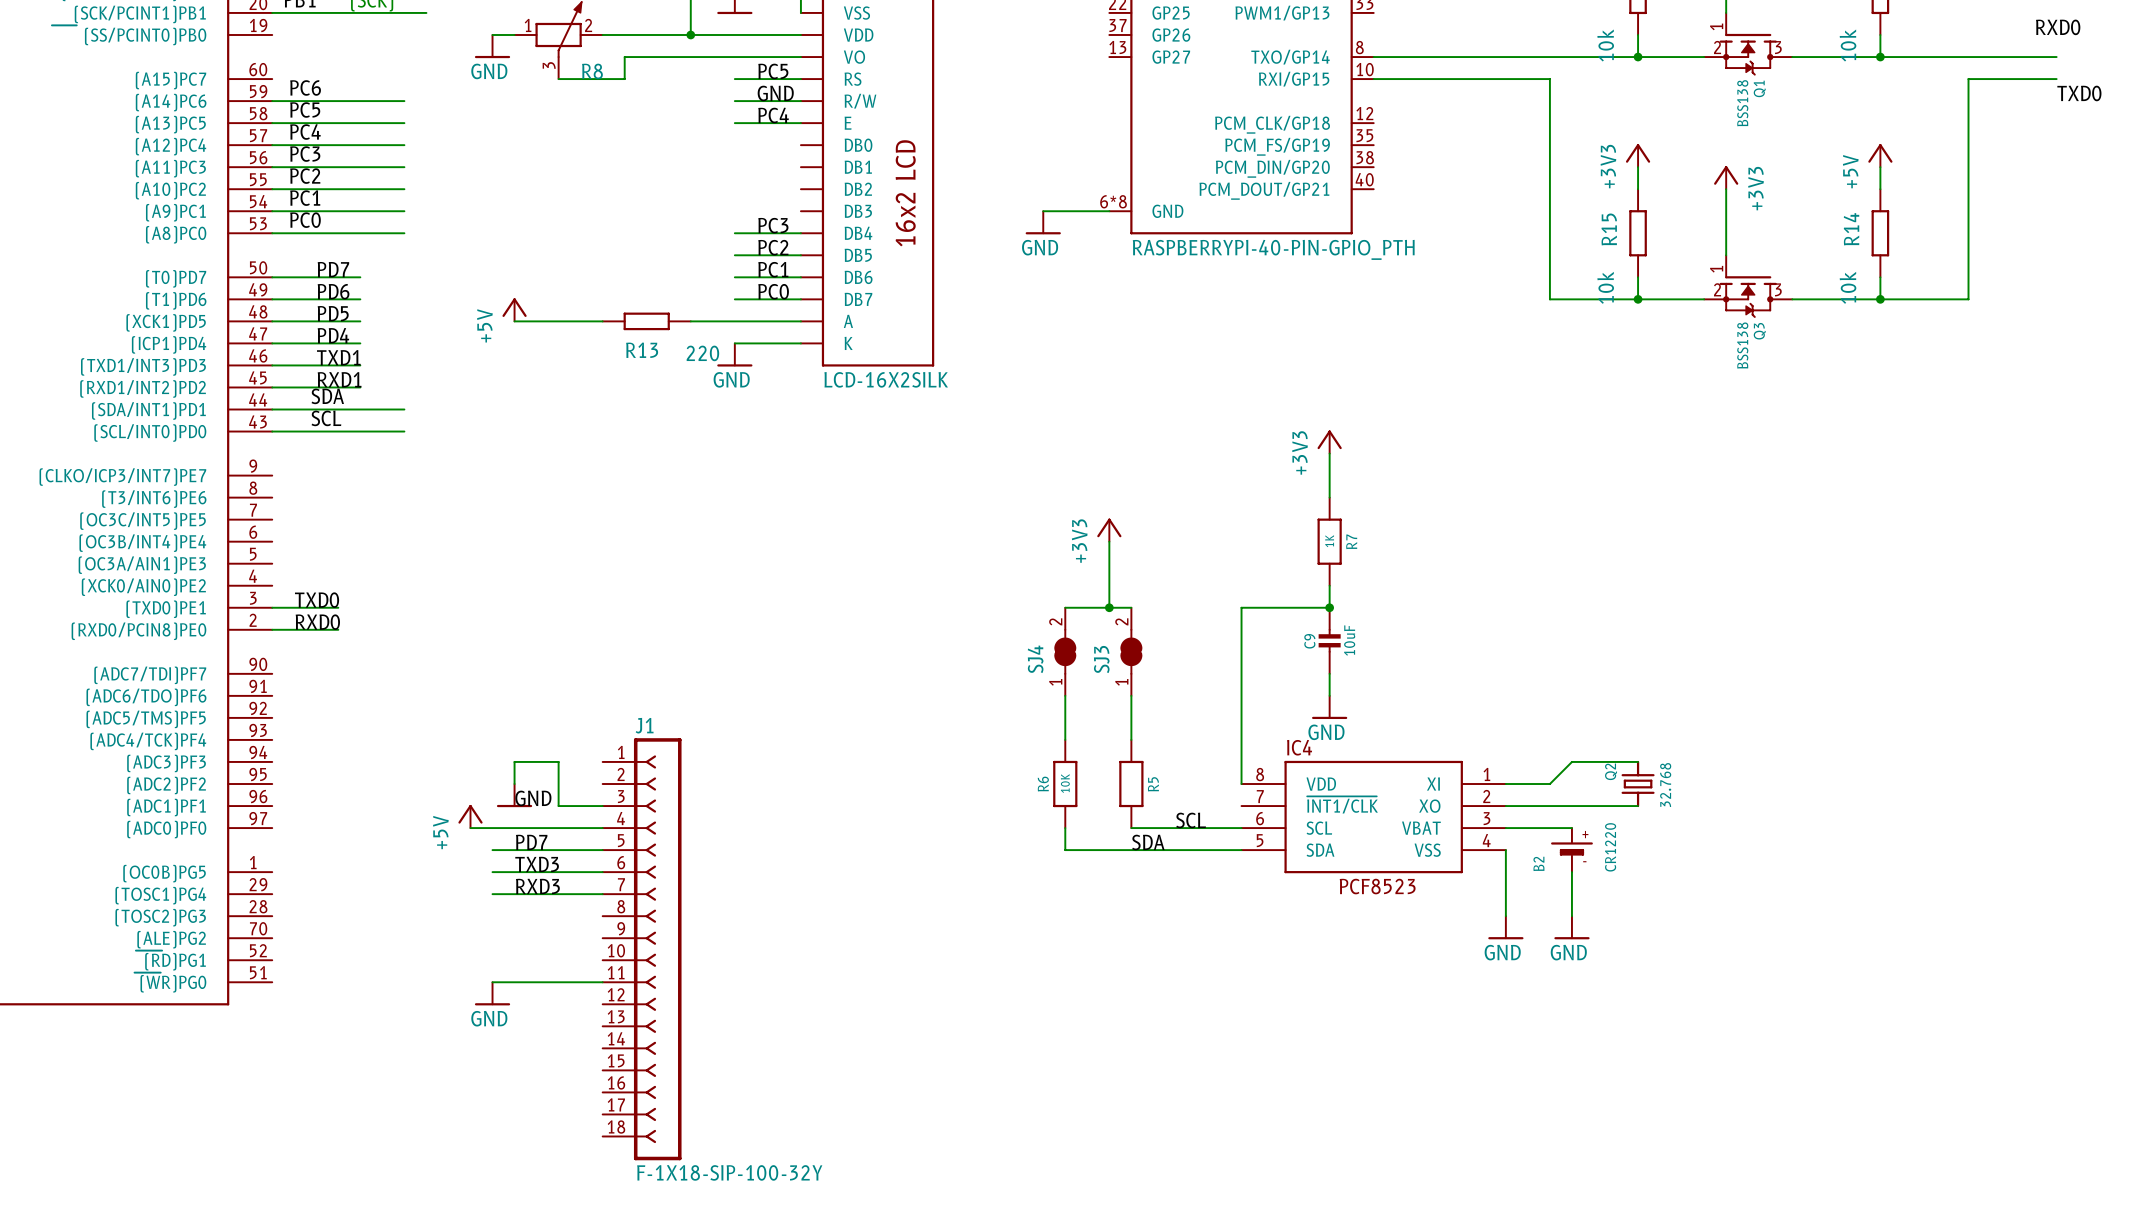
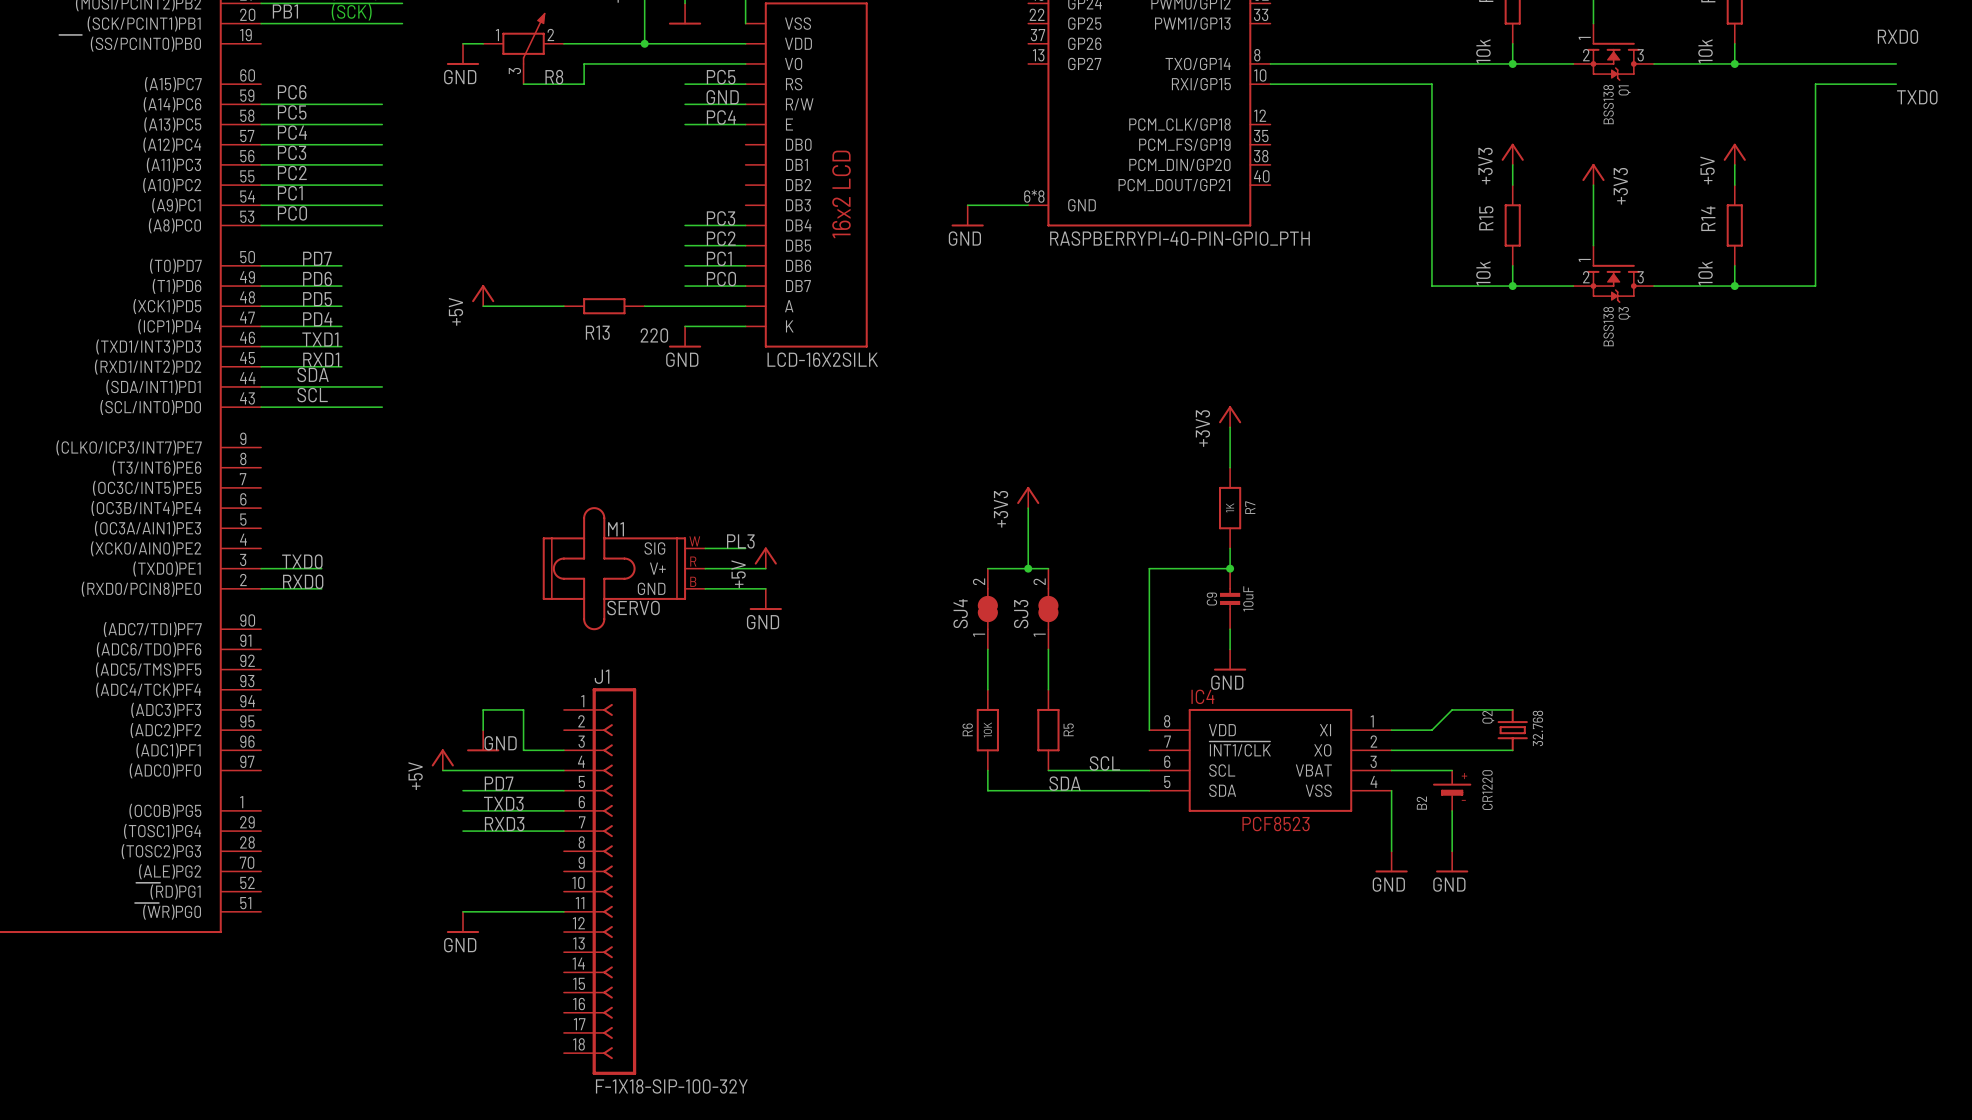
label: none -> PL3 (740, 541)
wire: none -> (705, 548) (745, 548)
power symbol: none -> +5V (765, 558)
M1: none -> SERVO (623, 568)
wire: none -> (705, 568) (765, 568)
wire: none -> (705, 588) (765, 588)
power symbol: none -> GND (765, 599)

